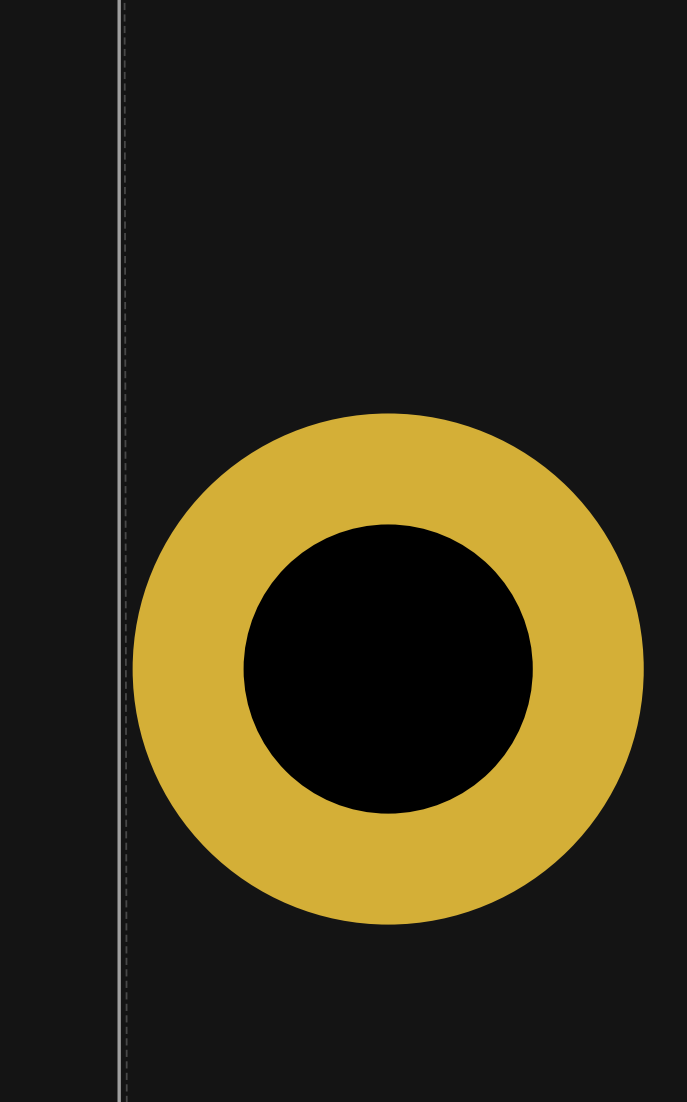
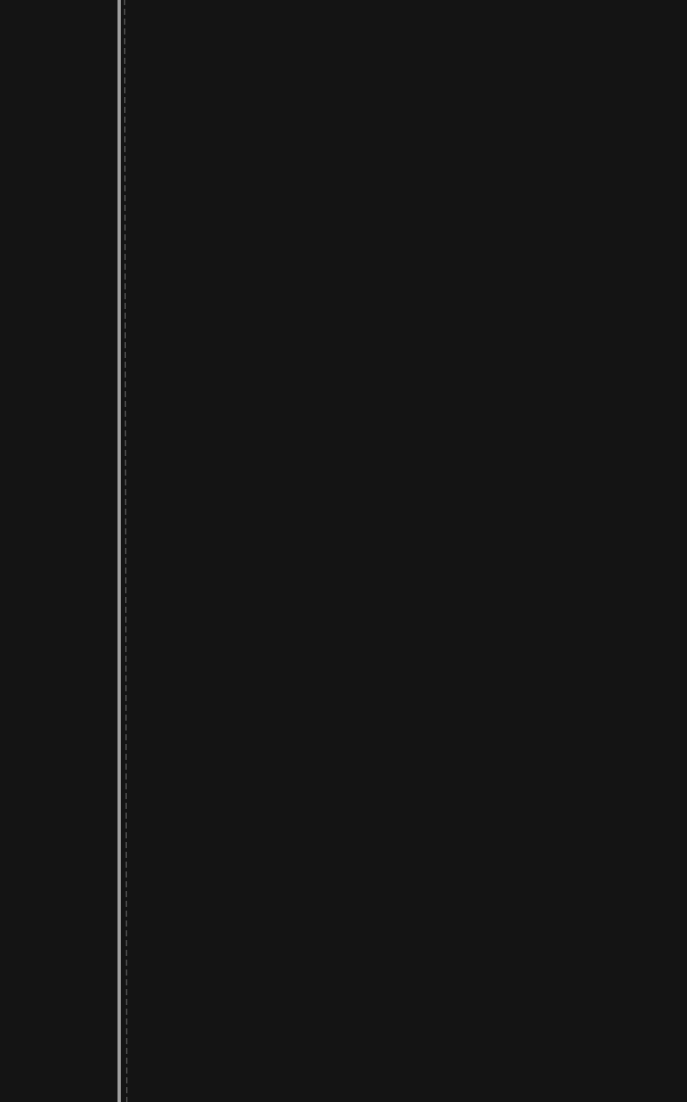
part: (388, 669) -> none

